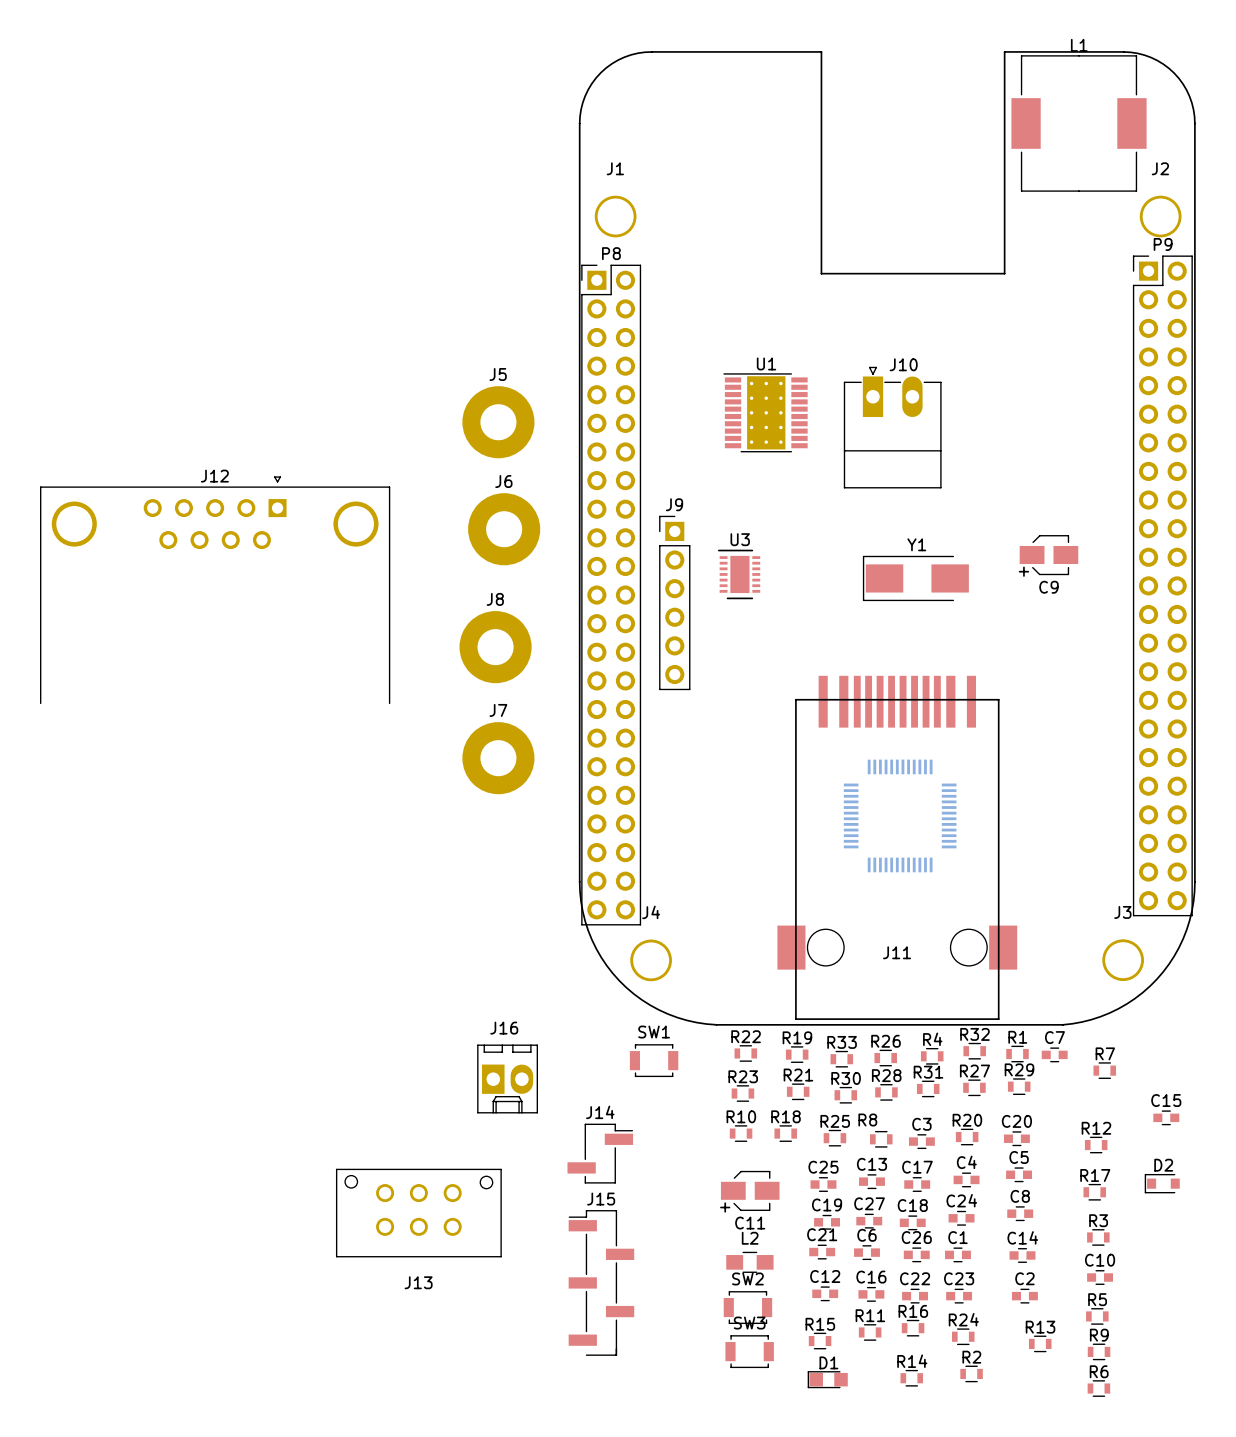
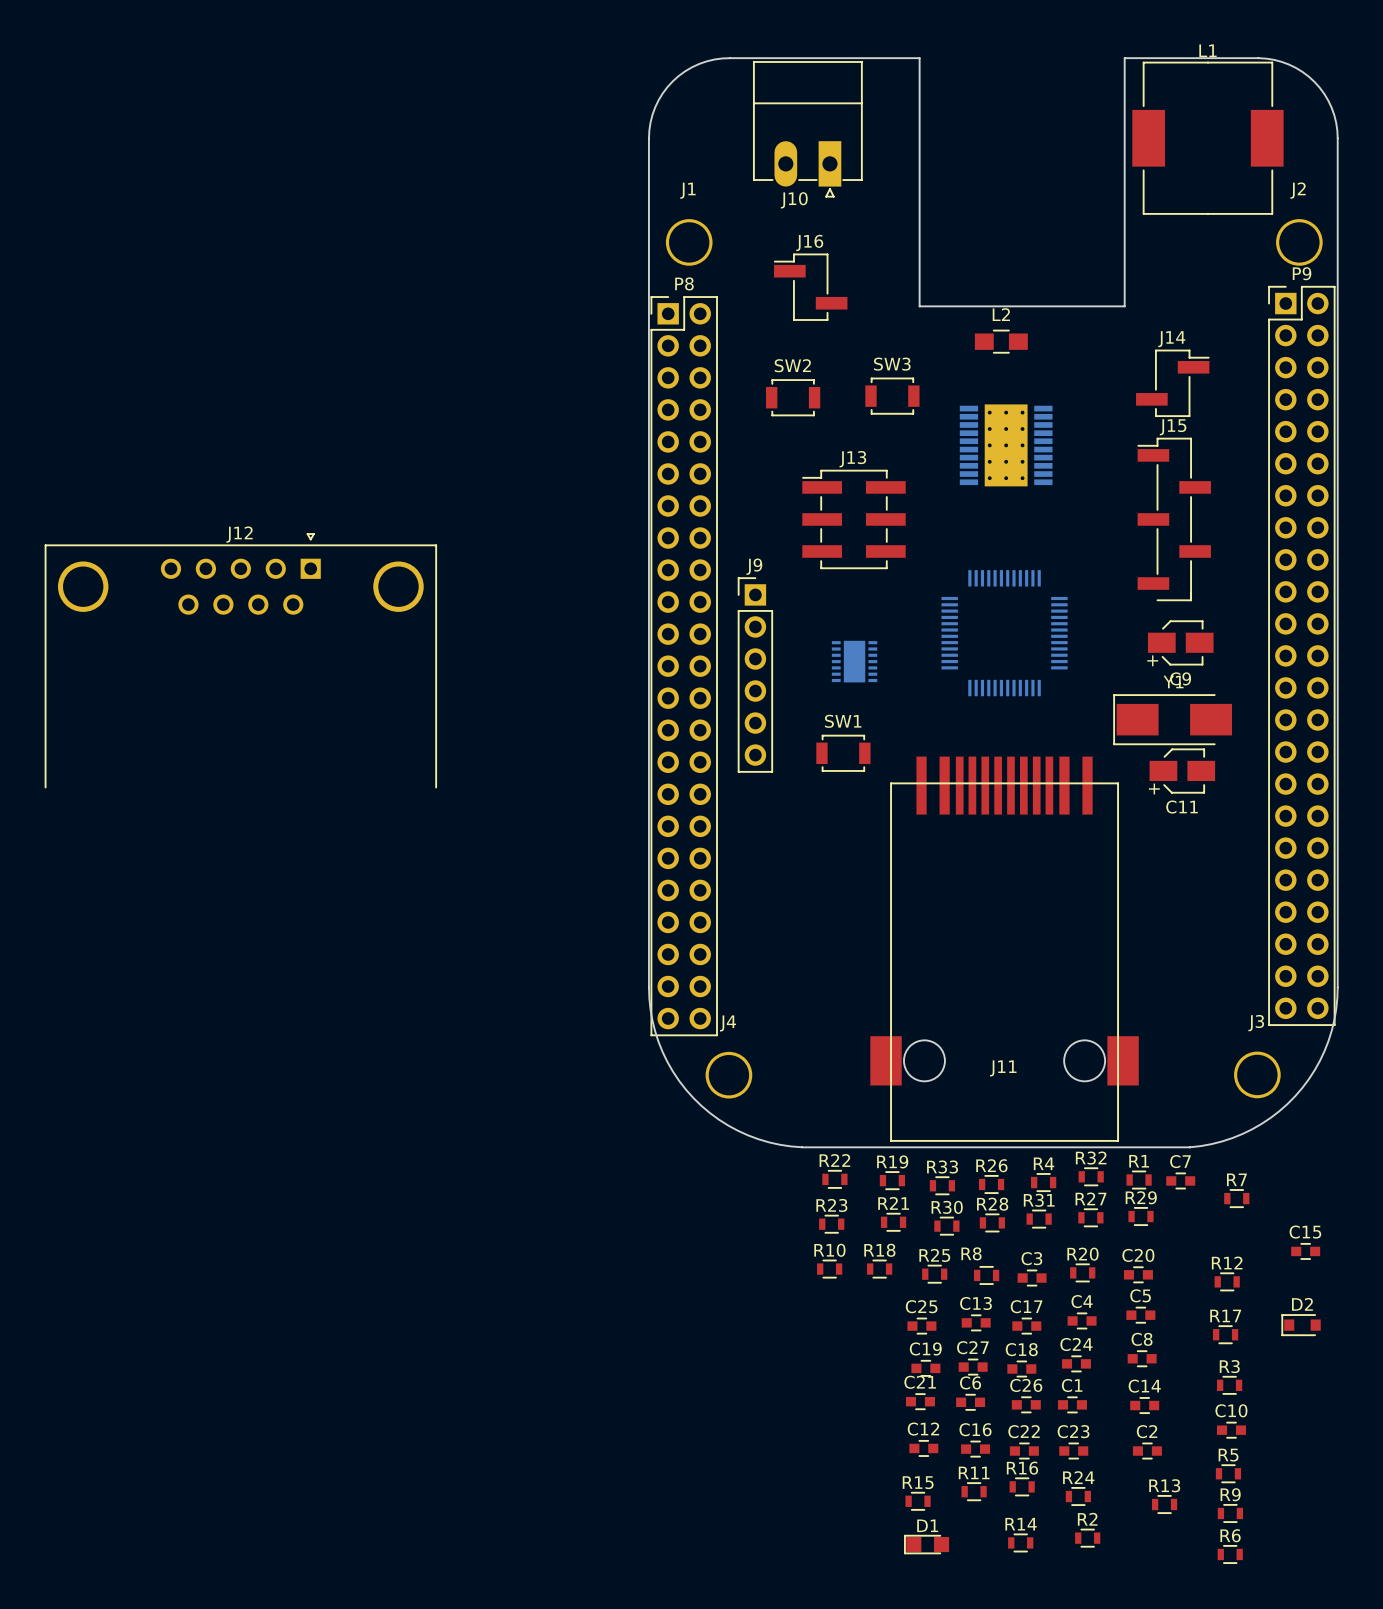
U1 side: top (765, 412) -> bottom (1006, 445)
J5: (498, 422) -> none
J10 rotation: 0° (892, 427) -> 180° (807, 129)
J10 position: (892, 427) -> (807, 129)
J6: (504, 529) -> none
C9 position: (1048, 555) -> (1180, 642)
U3 side: top (739, 574) -> bottom (854, 661)
Y1 position: (915, 578) -> (1172, 719)
J8: (495, 647) -> none
J7: (498, 758) -> none
part position: (900, 815) -> (1004, 633)
J16 footprint: [477, 1044, 539, 1114] -> [774, 253, 848, 321]
SW1 position: (654, 1060) -> (843, 753)
J14 position: (600, 1153) -> (1172, 383)
J13 footprint: [335, 1168, 502, 1258] -> [802, 469, 906, 570]
C11 position: (750, 1190) -> (1182, 771)
L2 position: (749, 1262) -> (1001, 341)
J13 name position: J13 (418, 1282) -> J13 (852, 459)
J15 position: (601, 1282) -> (1174, 519)
SW2 position: (747, 1307) -> (793, 397)
SW3 position: (749, 1351) -> (892, 396)

